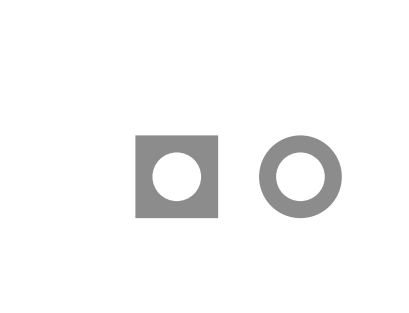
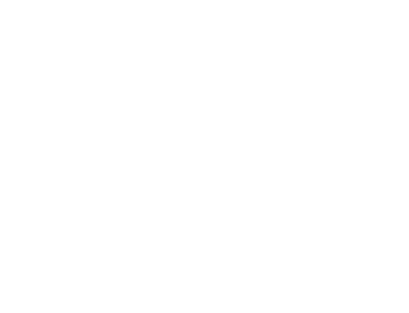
part: (238, 176) -> none

